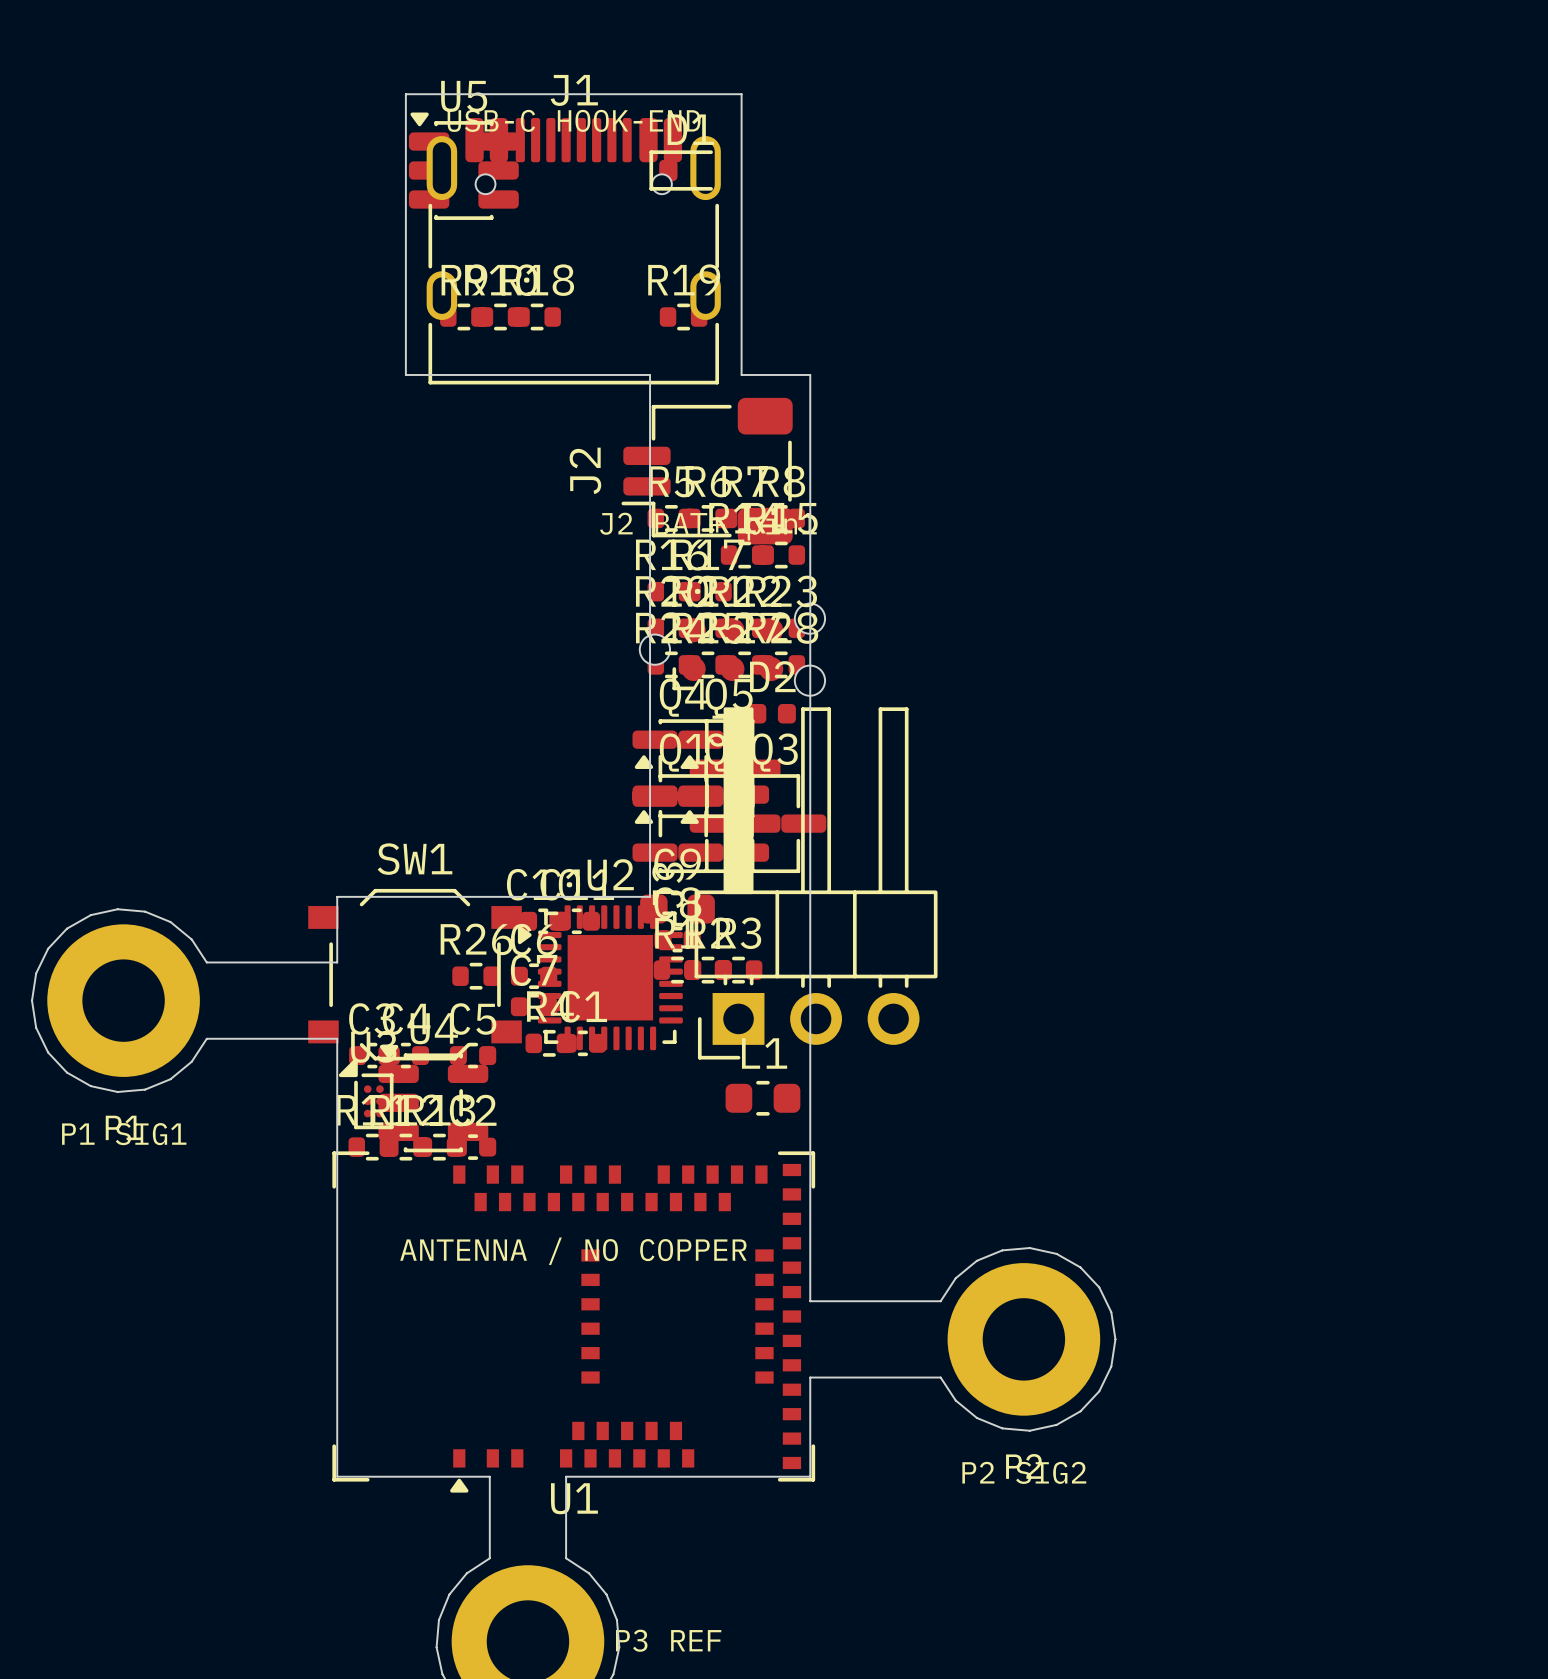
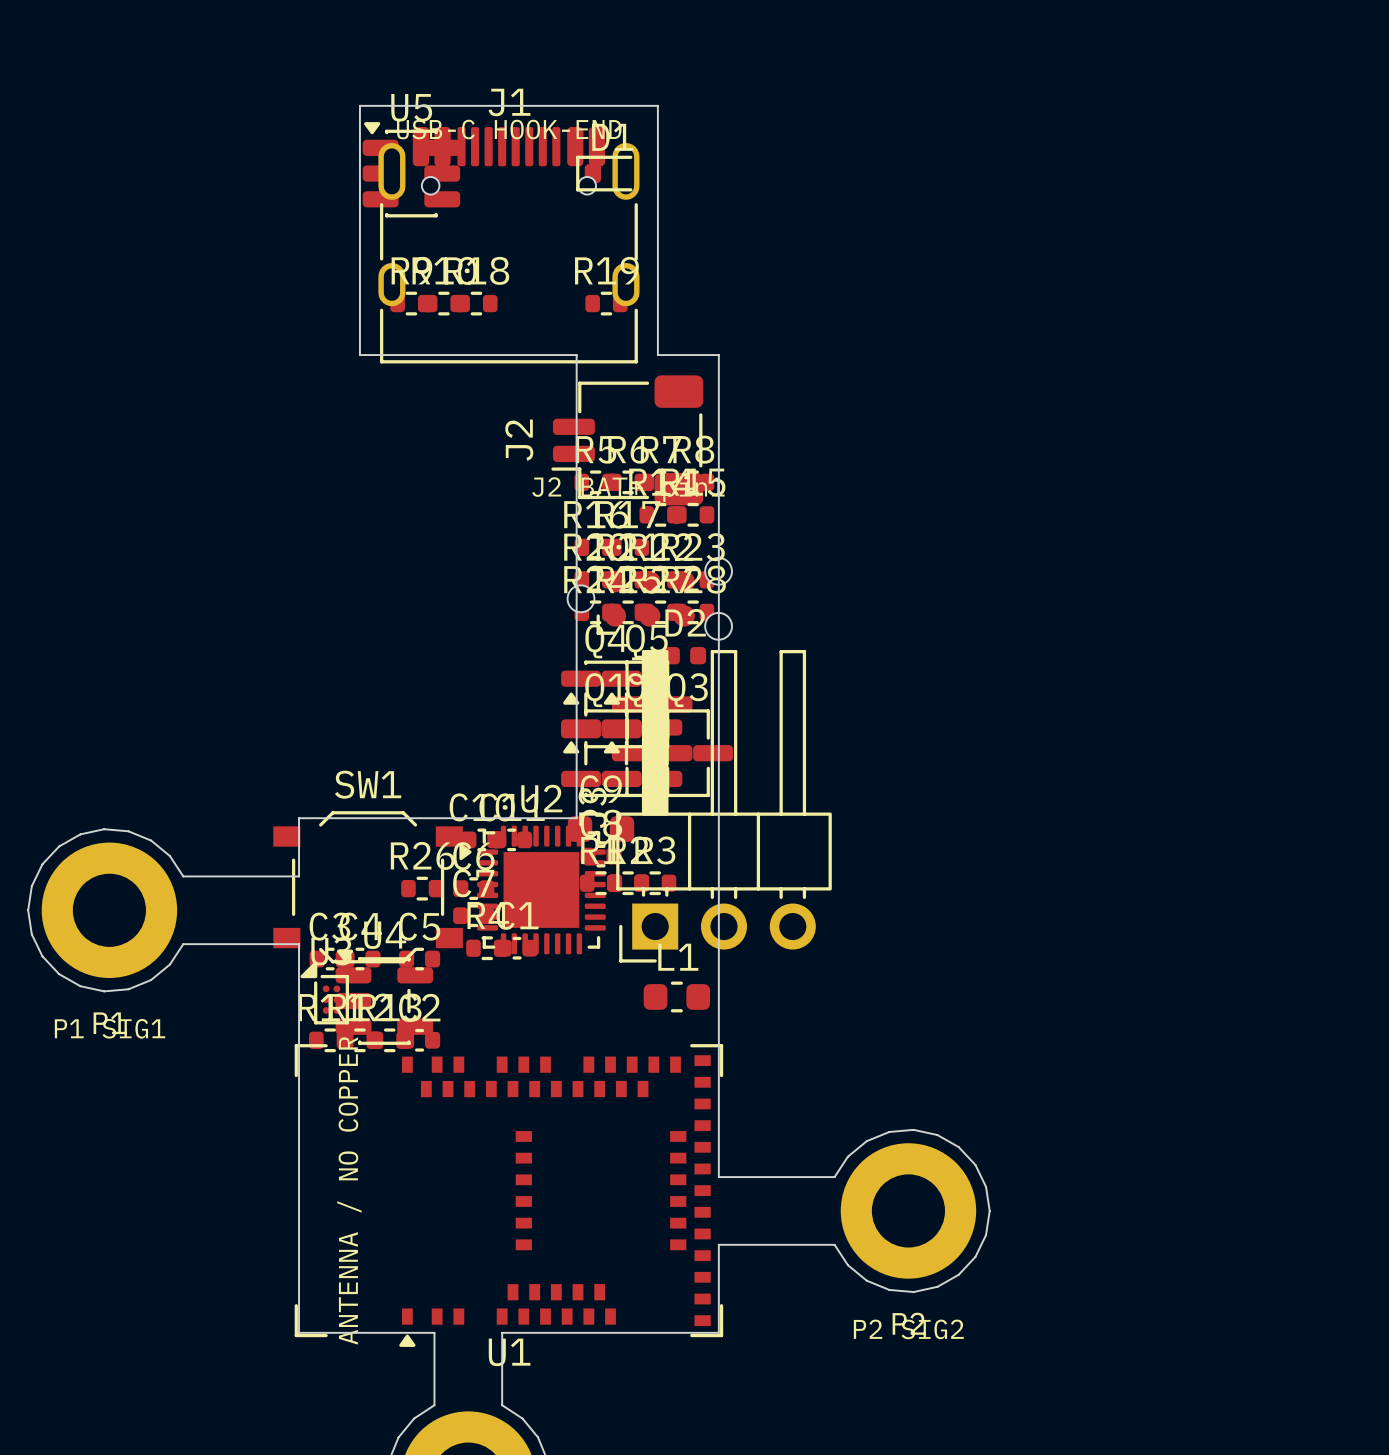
text rotation: 0° (573, 1251) -> 90° counterclockwise (349, 1190)

